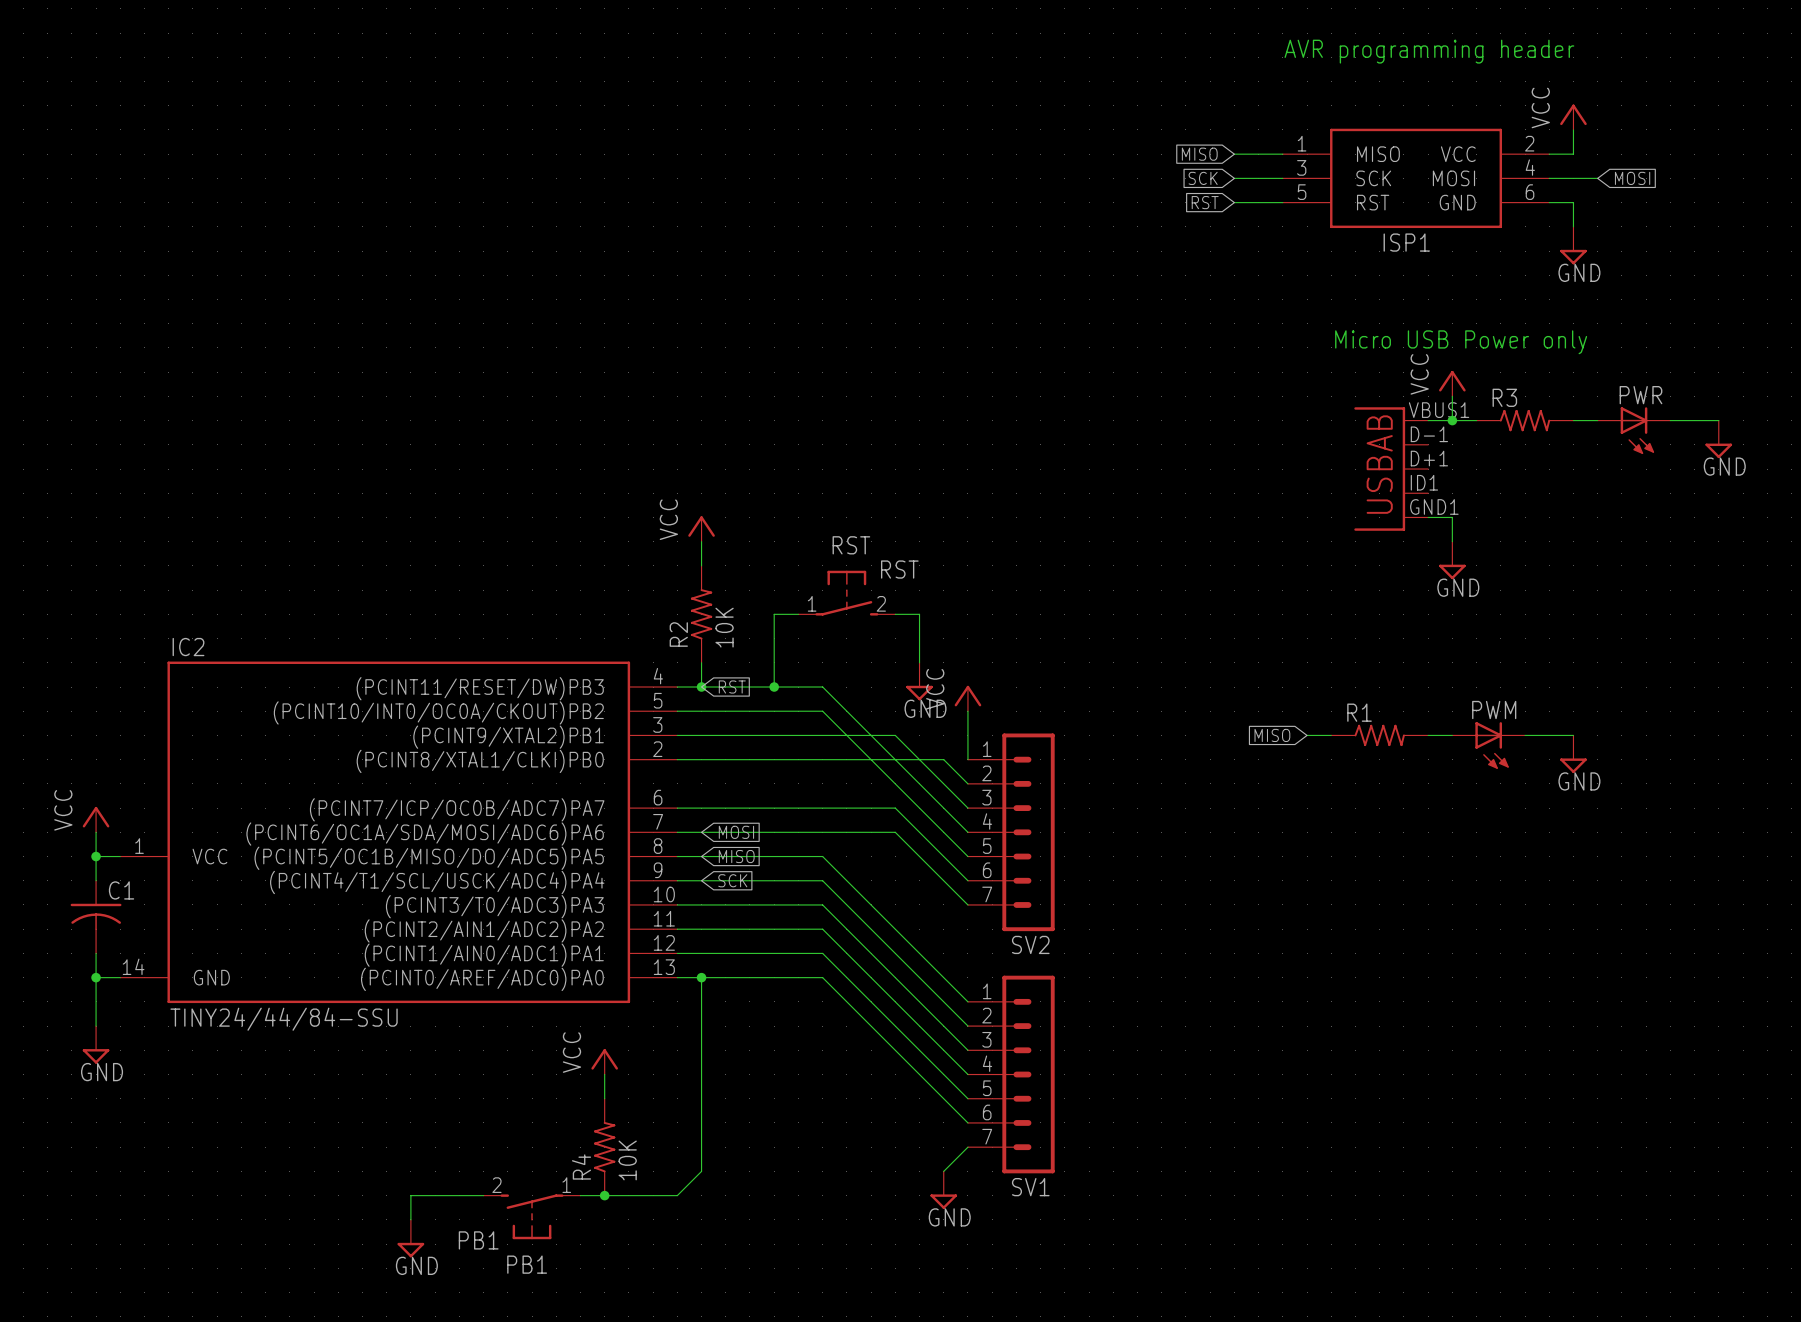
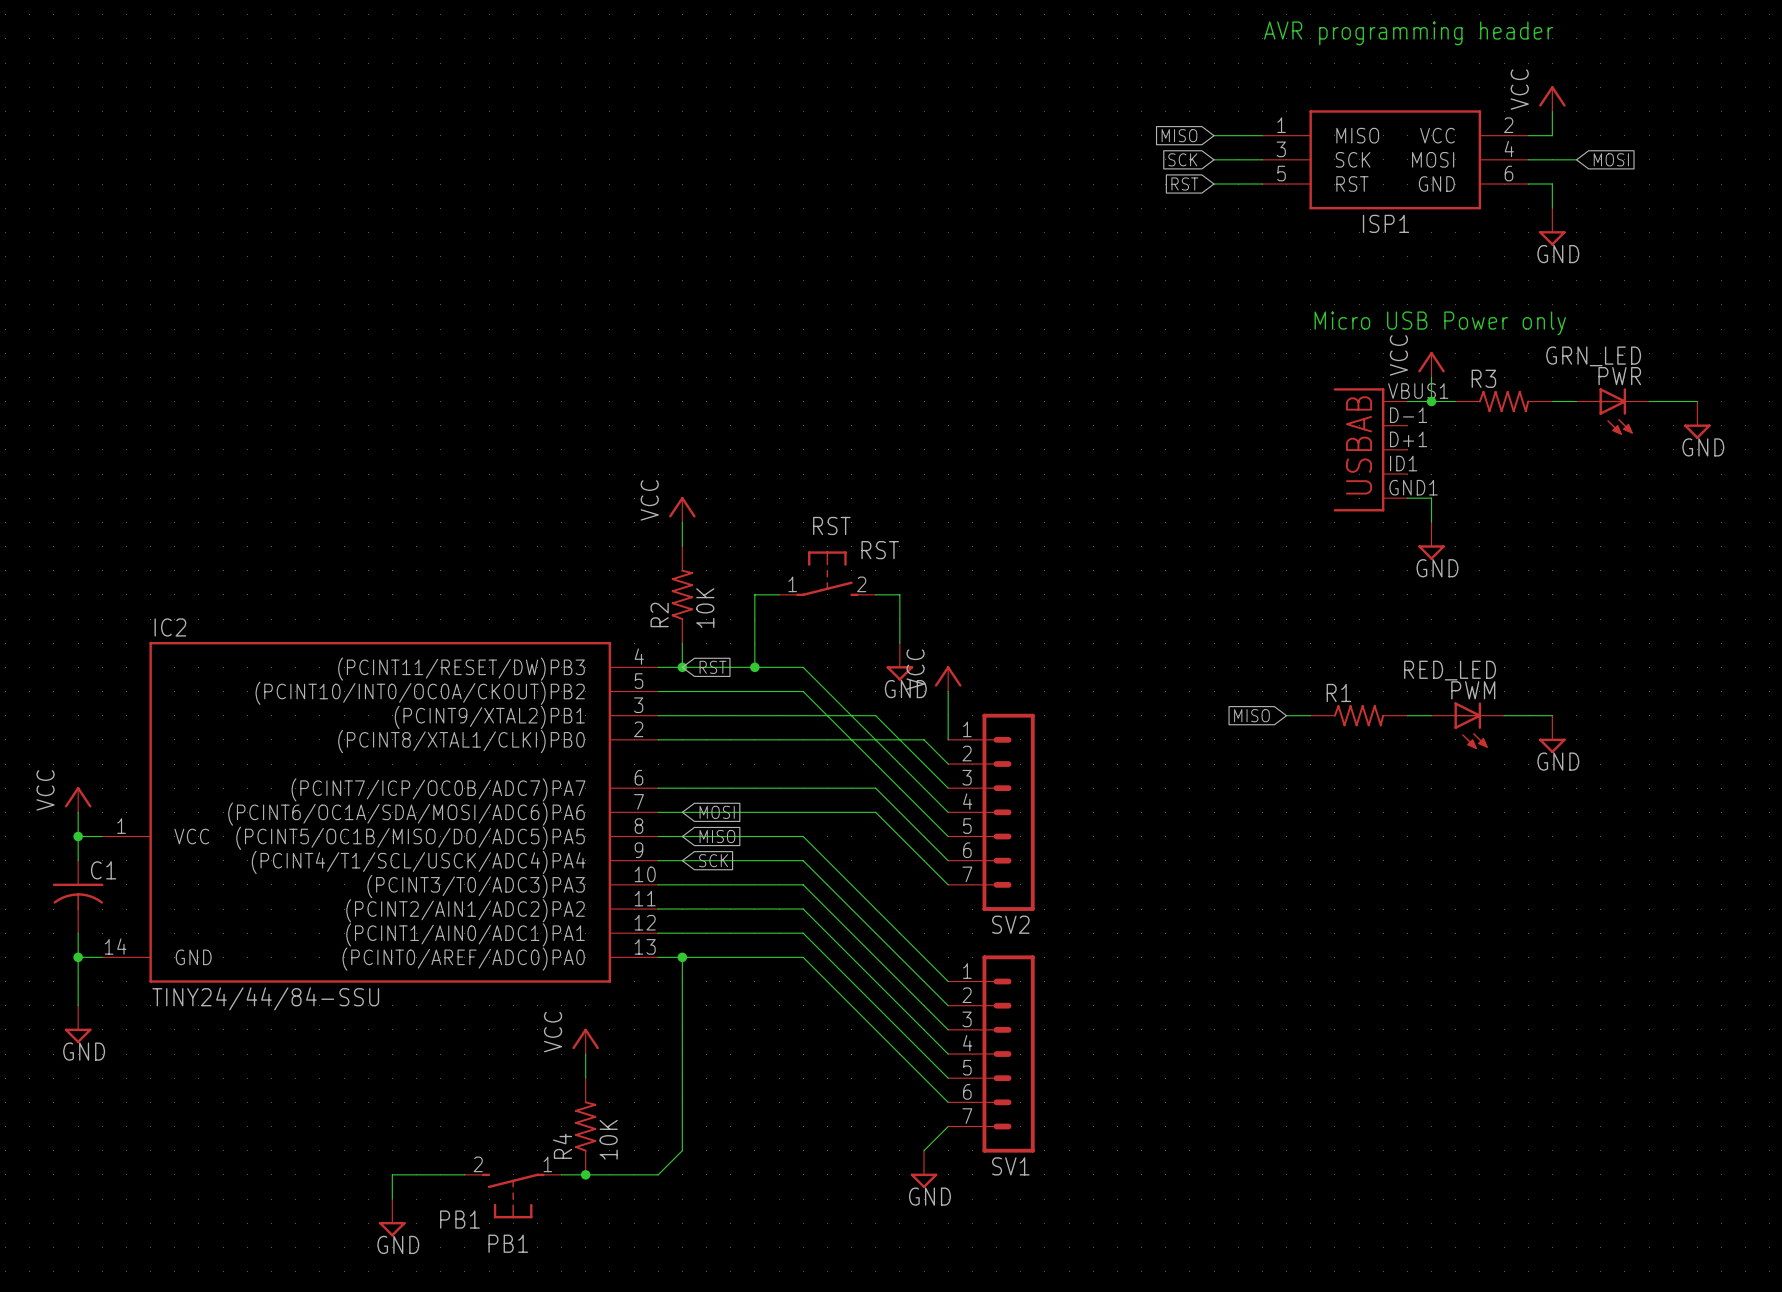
PWR value: none -> GRN_LED (1593, 356)
PWM value: none -> RED_LED (1450, 670)

